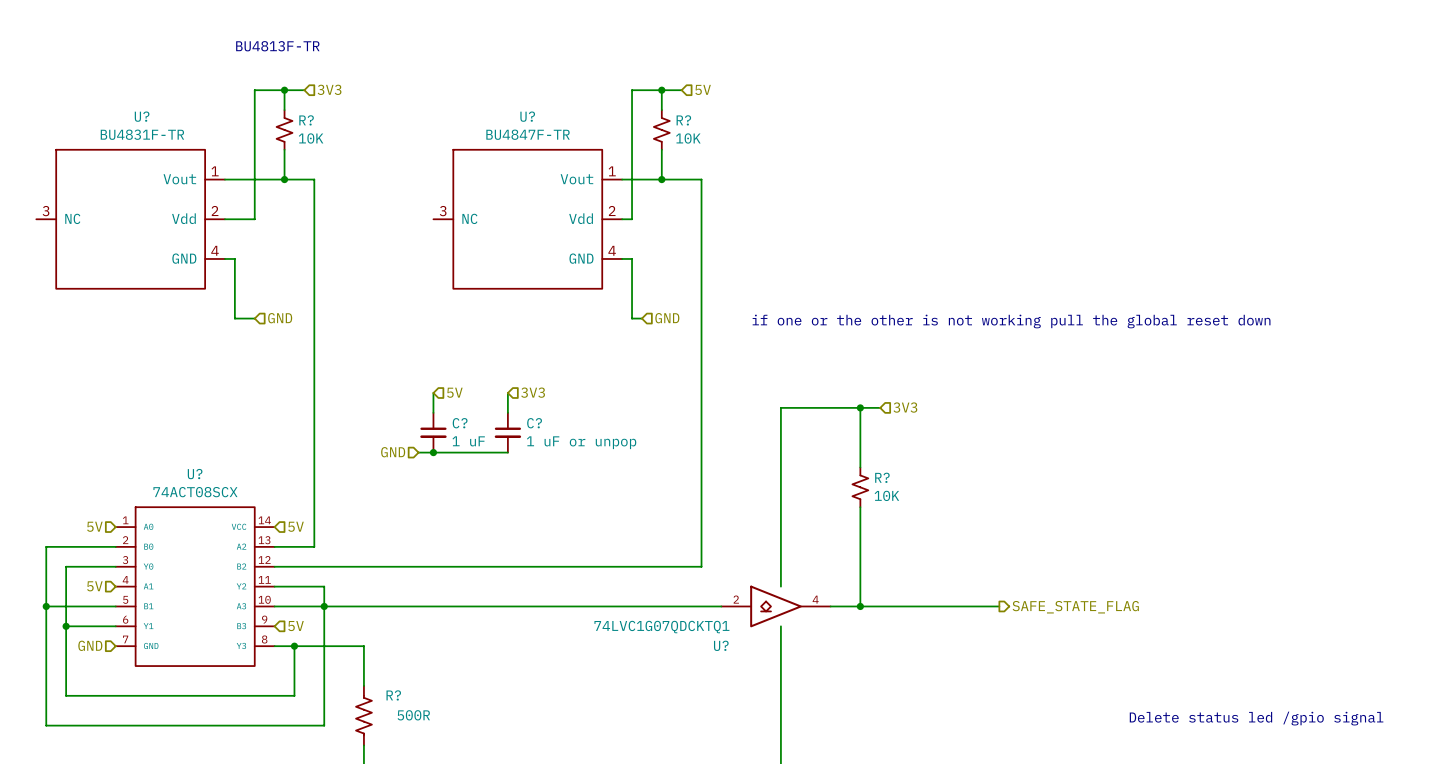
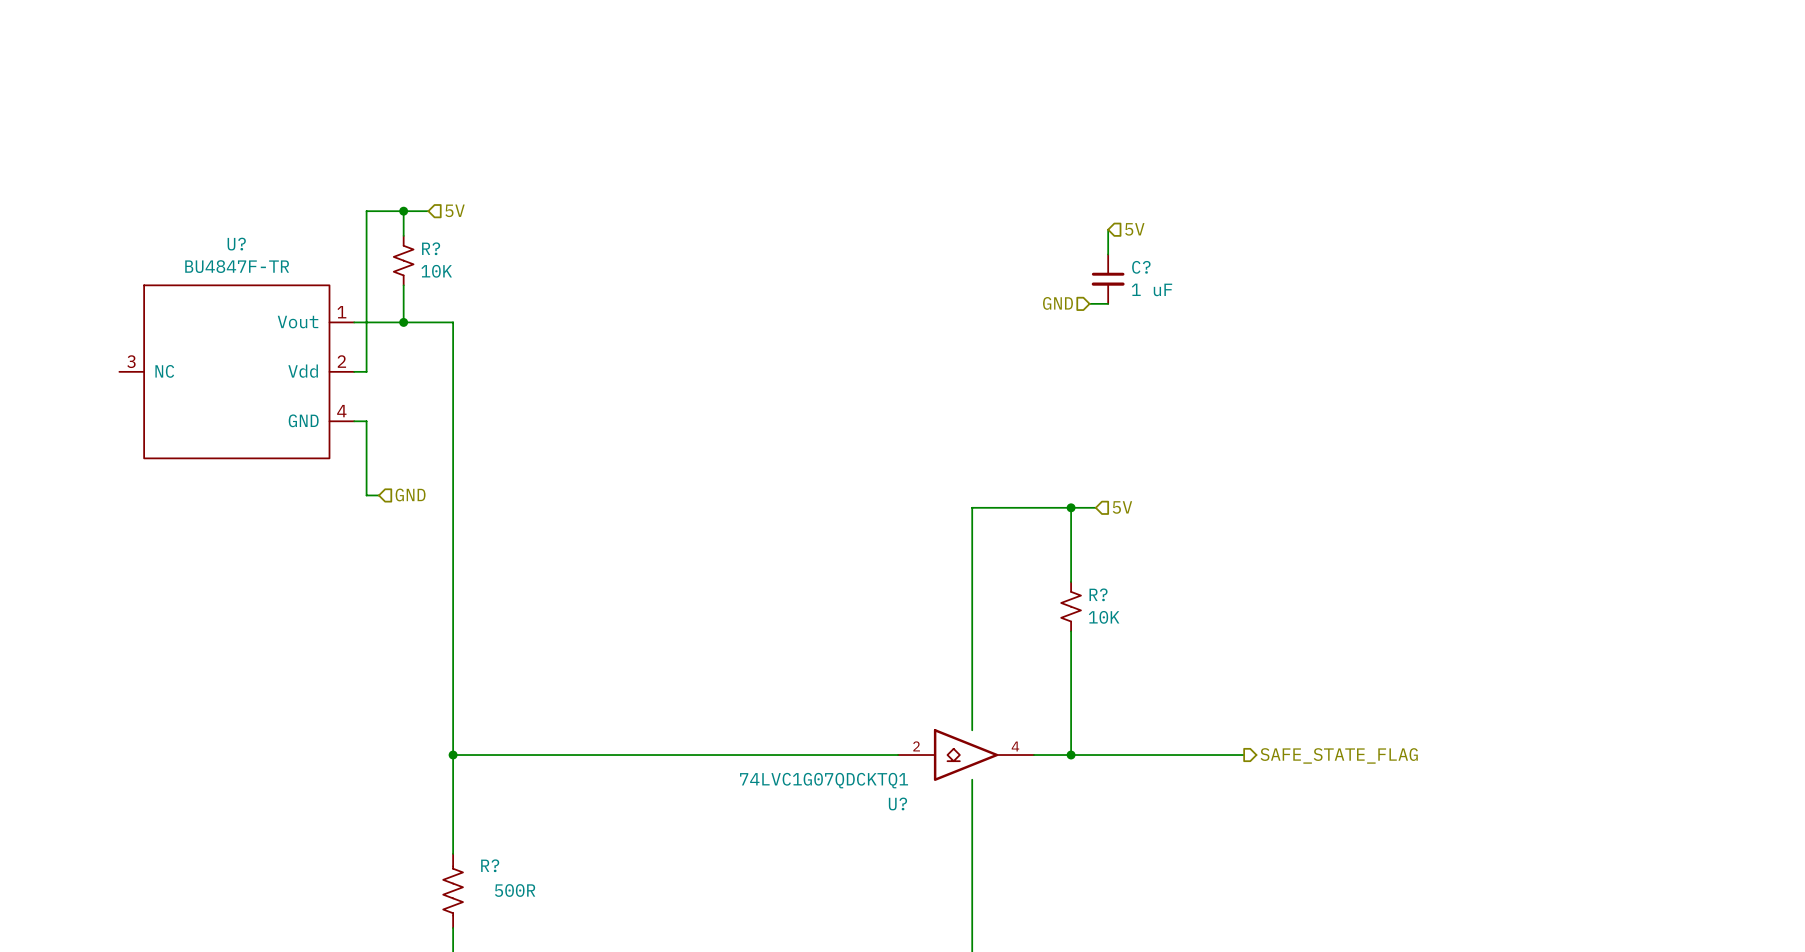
text: BU4813F-TR (277, 46) -> none
hierarchical label: 3V3 (329, 89) -> none
hierarchical label: 5V (703, 89) -> none
wire: (284, 90) (284, 110) -> (403, 211) (403, 235)
junction: (284, 90) -> none
wire: (304, 90) (254, 90) (254, 219) (224, 219) -> none
wire: (661, 90) (661, 110) -> none
junction: (661, 90) -> none
wire: (681, 90) (632, 90) (632, 219) (622, 219) -> none
R? position: (284, 129) -> (403, 260)
R?: 10K (661, 129) -> none
wire: (284, 149) (284, 179) -> (403, 285) (403, 322)
wire: (661, 149) (661, 179) -> none
wire: none -> (428, 211) (366, 211) (366, 371) (354, 371)
hierarchical label: none -> 5V (455, 210)
wire: (224, 179) (314, 179) (314, 546) (274, 546) -> none
junction position: (284, 179) -> (403, 211)
wire: (622, 179) (701, 179) (701, 566) (274, 566) -> none
junction: (661, 179) -> none
wire: none -> (1108, 229) (1108, 254)
hierarchical label: none -> 5V (1134, 229)
U?: BU4831F-TR (130, 219) -> none
U?: BU4847F-TR (527, 219) -> none
C?: none -> 1 uF (1108, 279)
hierarchical label: none -> GND (1057, 303)
wire: none -> (1089, 303) (1108, 303)
wire: (224, 258) (234, 258) (234, 318) (254, 318) -> none
junction: none -> (403, 322)
wire: (622, 258) (632, 258) (632, 318) (641, 318) -> none
U?: none -> BU4847F-TR (236, 371)
hierarchical label: GND (280, 318) -> none
hierarchical label: GND (667, 318) -> none
text: if one or the other is not working pull the global reset down (1011, 321) -> none
wire: none -> (354, 421) (366, 421) (366, 495) (378, 495)
hierarchical label: 5V (454, 392) -> none
hierarchical label: 3V3 (533, 392) -> none
wire: (433, 393) (433, 412) -> none
wire: (507, 393) (507, 412) -> none
hierarchical label: none -> GND (410, 494)
hierarchical label: 3V3 (905, 407) -> 5V (1122, 507)
C?: 1 uF (433, 432) -> none
C?: 1 uF or unpop (507, 432) -> none
hierarchical label: GND (393, 452) -> none
wire: (418, 452) (507, 452) -> none
junction: (433, 452) -> none
hierarchical label: 5V (94, 526) -> none
hierarchical label: 5V (296, 526) -> none
wire: (115, 546) (46, 546) (46, 725) (324, 725) (324, 586) (274, 586) -> none
wire: (115, 566) (66, 566) (66, 695) (294, 695) (294, 646) -> none
hierarchical label: 5V (94, 586) -> none
U?: 74ACT08SCX (195, 586) -> none
wire: (46, 606) (115, 606) -> none
junction: (46, 606) -> none
wire: (274, 606) (363, 606) -> none
junction position: (324, 606) -> (453, 755)
wire: (66, 626) (115, 626) -> none
junction: (66, 626) -> none
hierarchical label: 5V (296, 626) -> none
hierarchical label: GND (90, 645) -> none
wire: (274, 646) (363, 646) -> (354, 322) (453, 322) (453, 804)
junction: (294, 646) -> none
text: Delete status led /gpio signal (1256, 718) -> none

